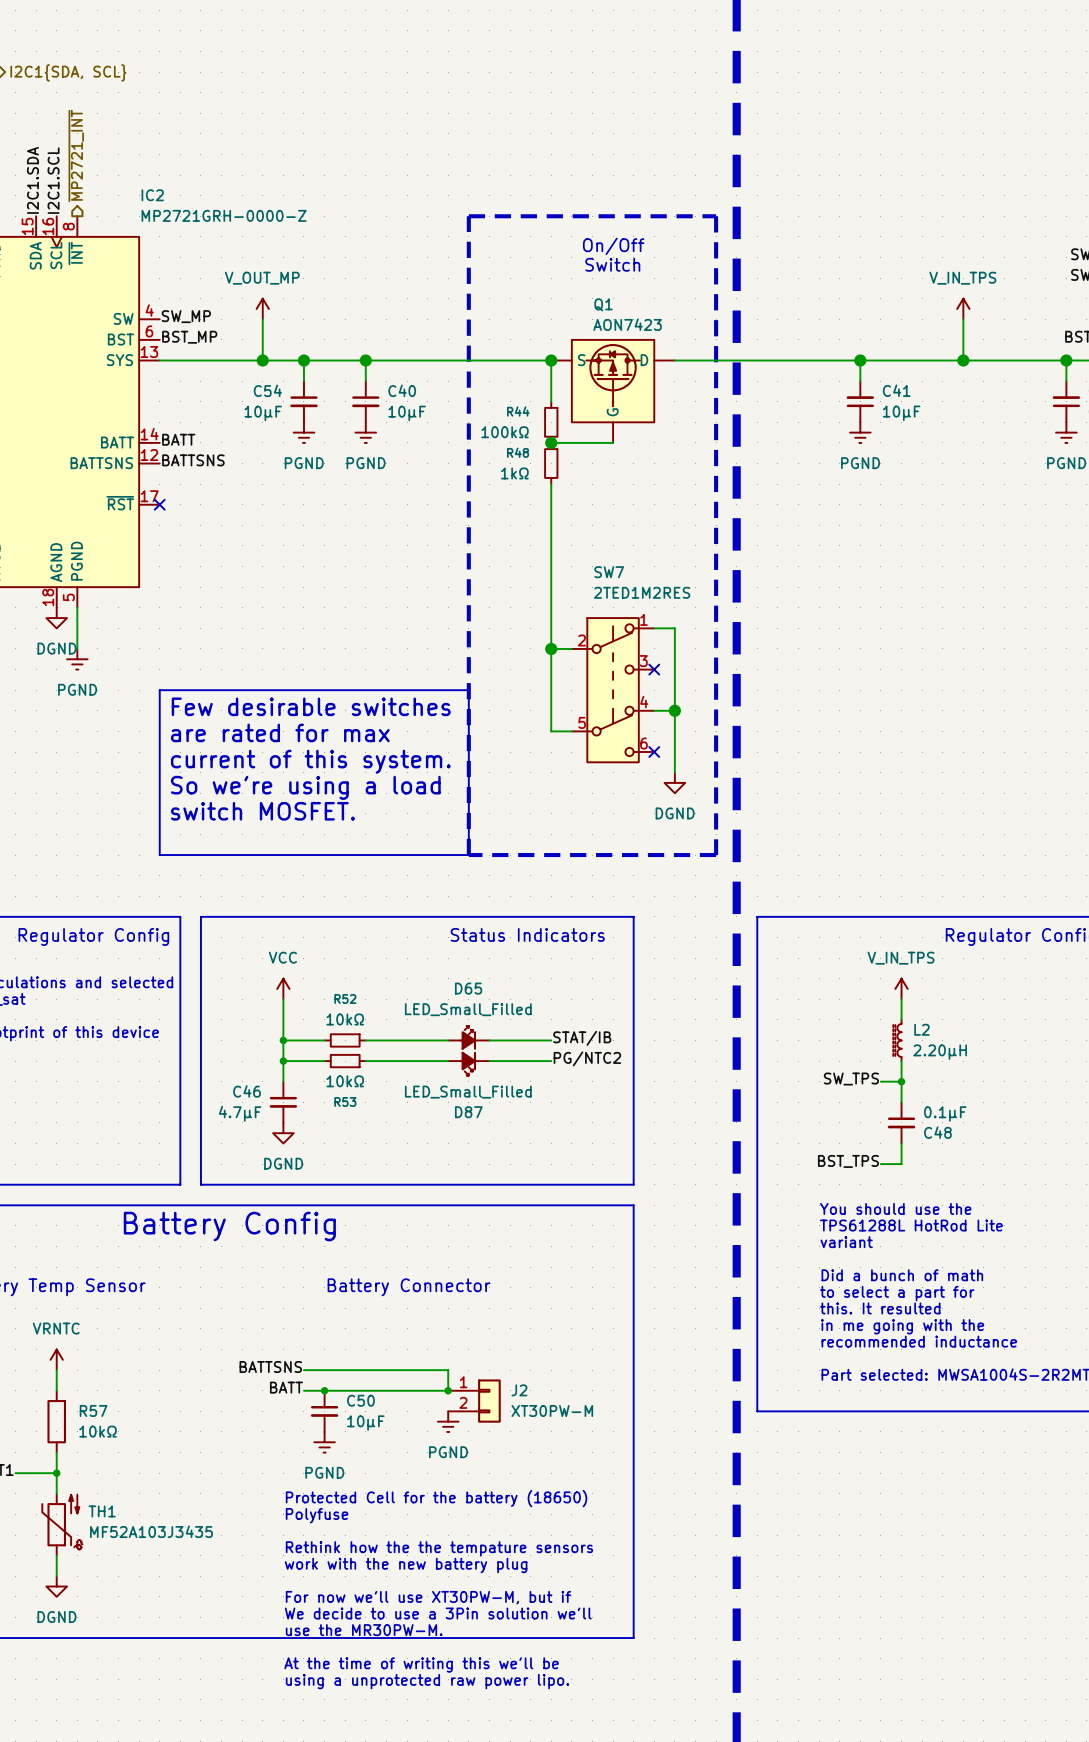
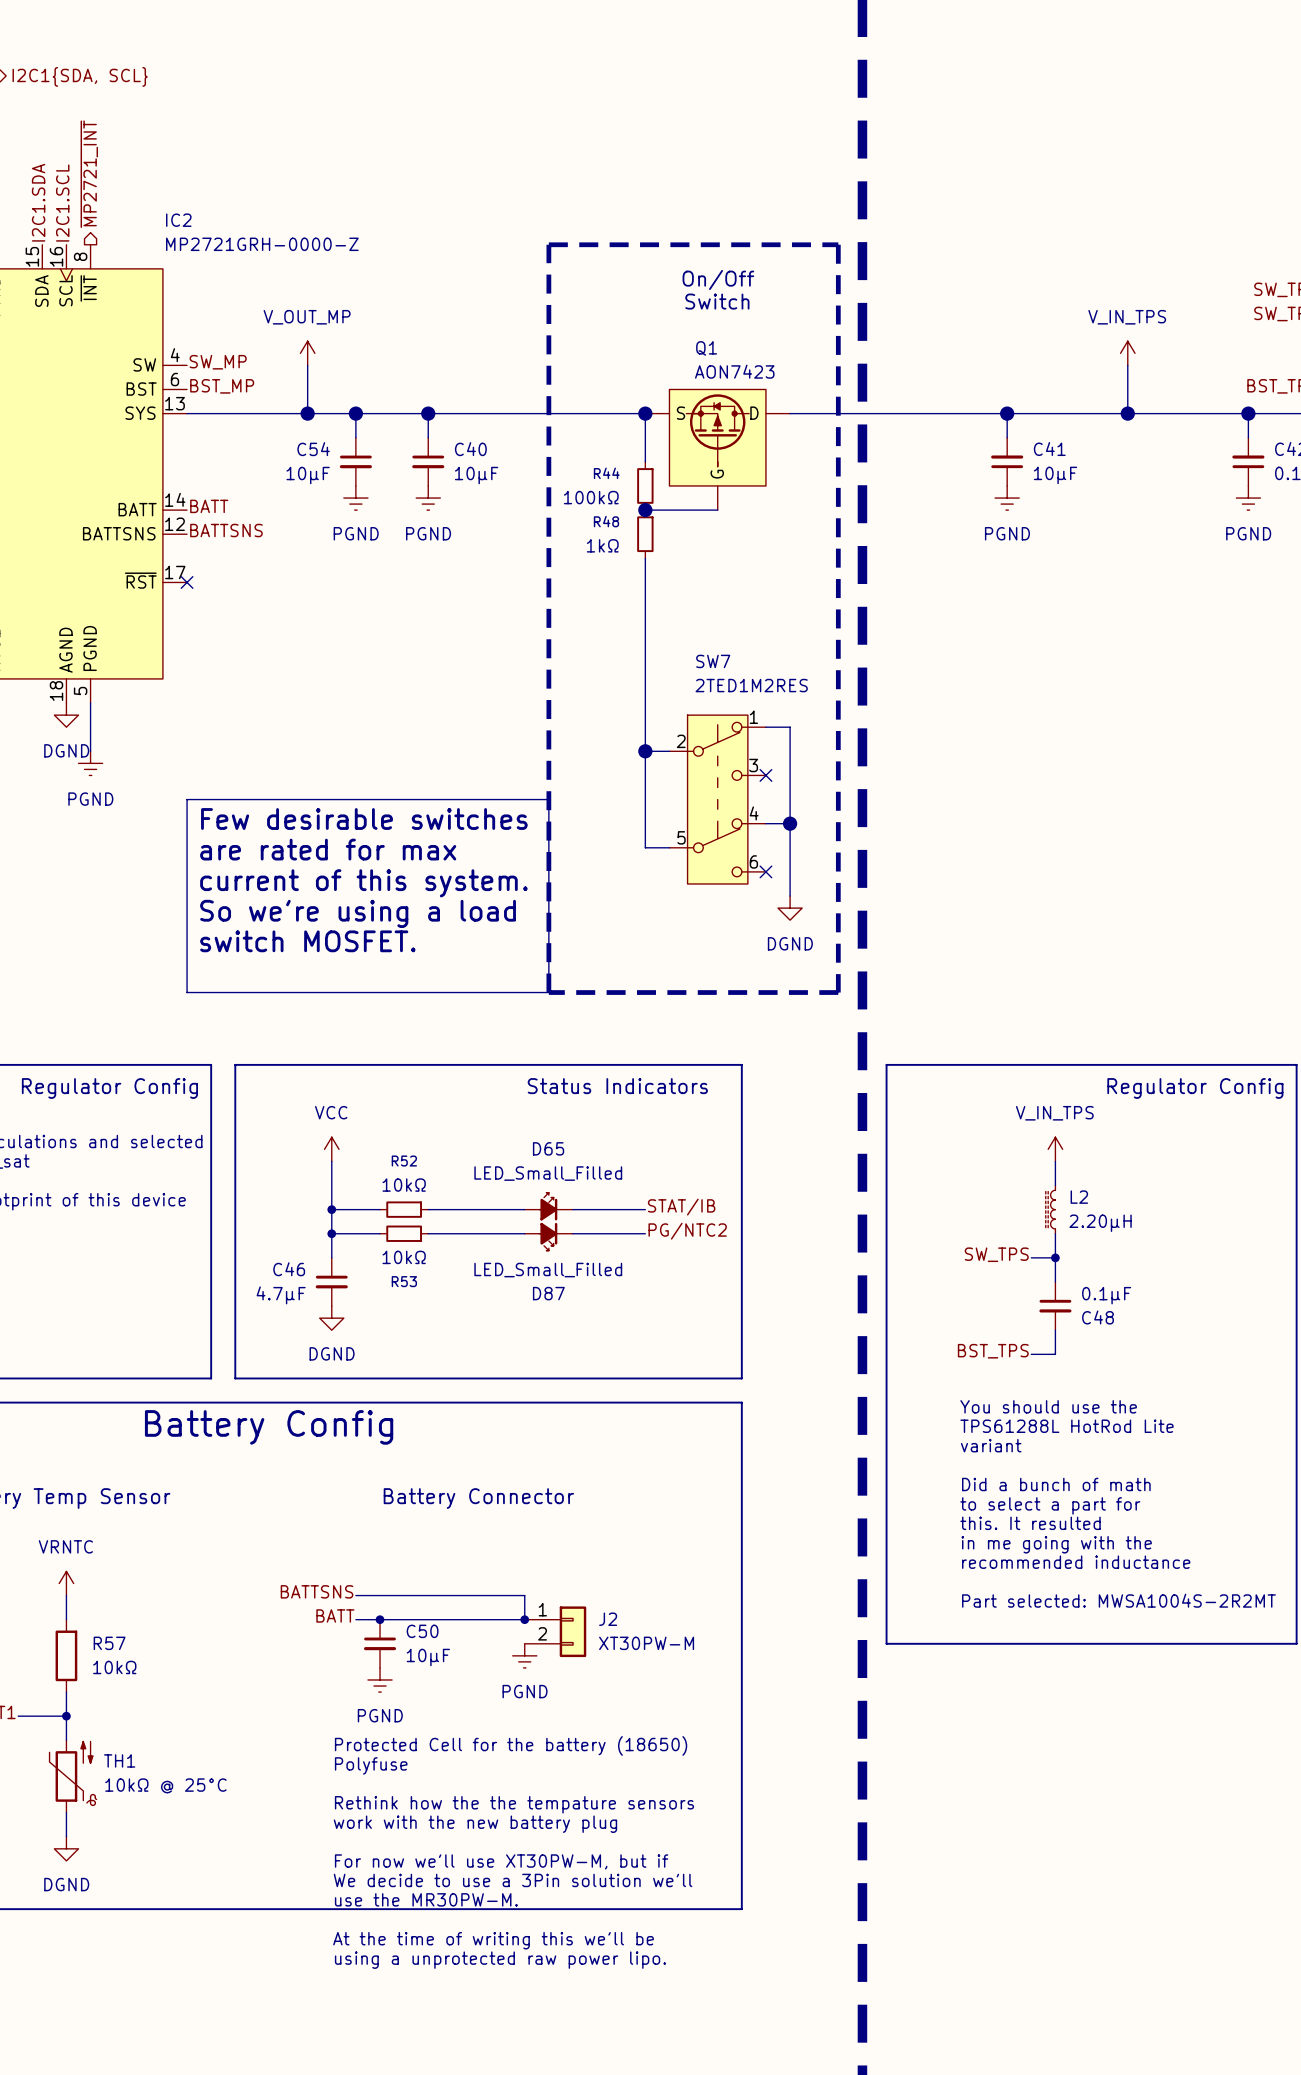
TH1 value: MF52A103J3435 (151, 1531) -> 10kΩ @ 25°C (165, 1785)

